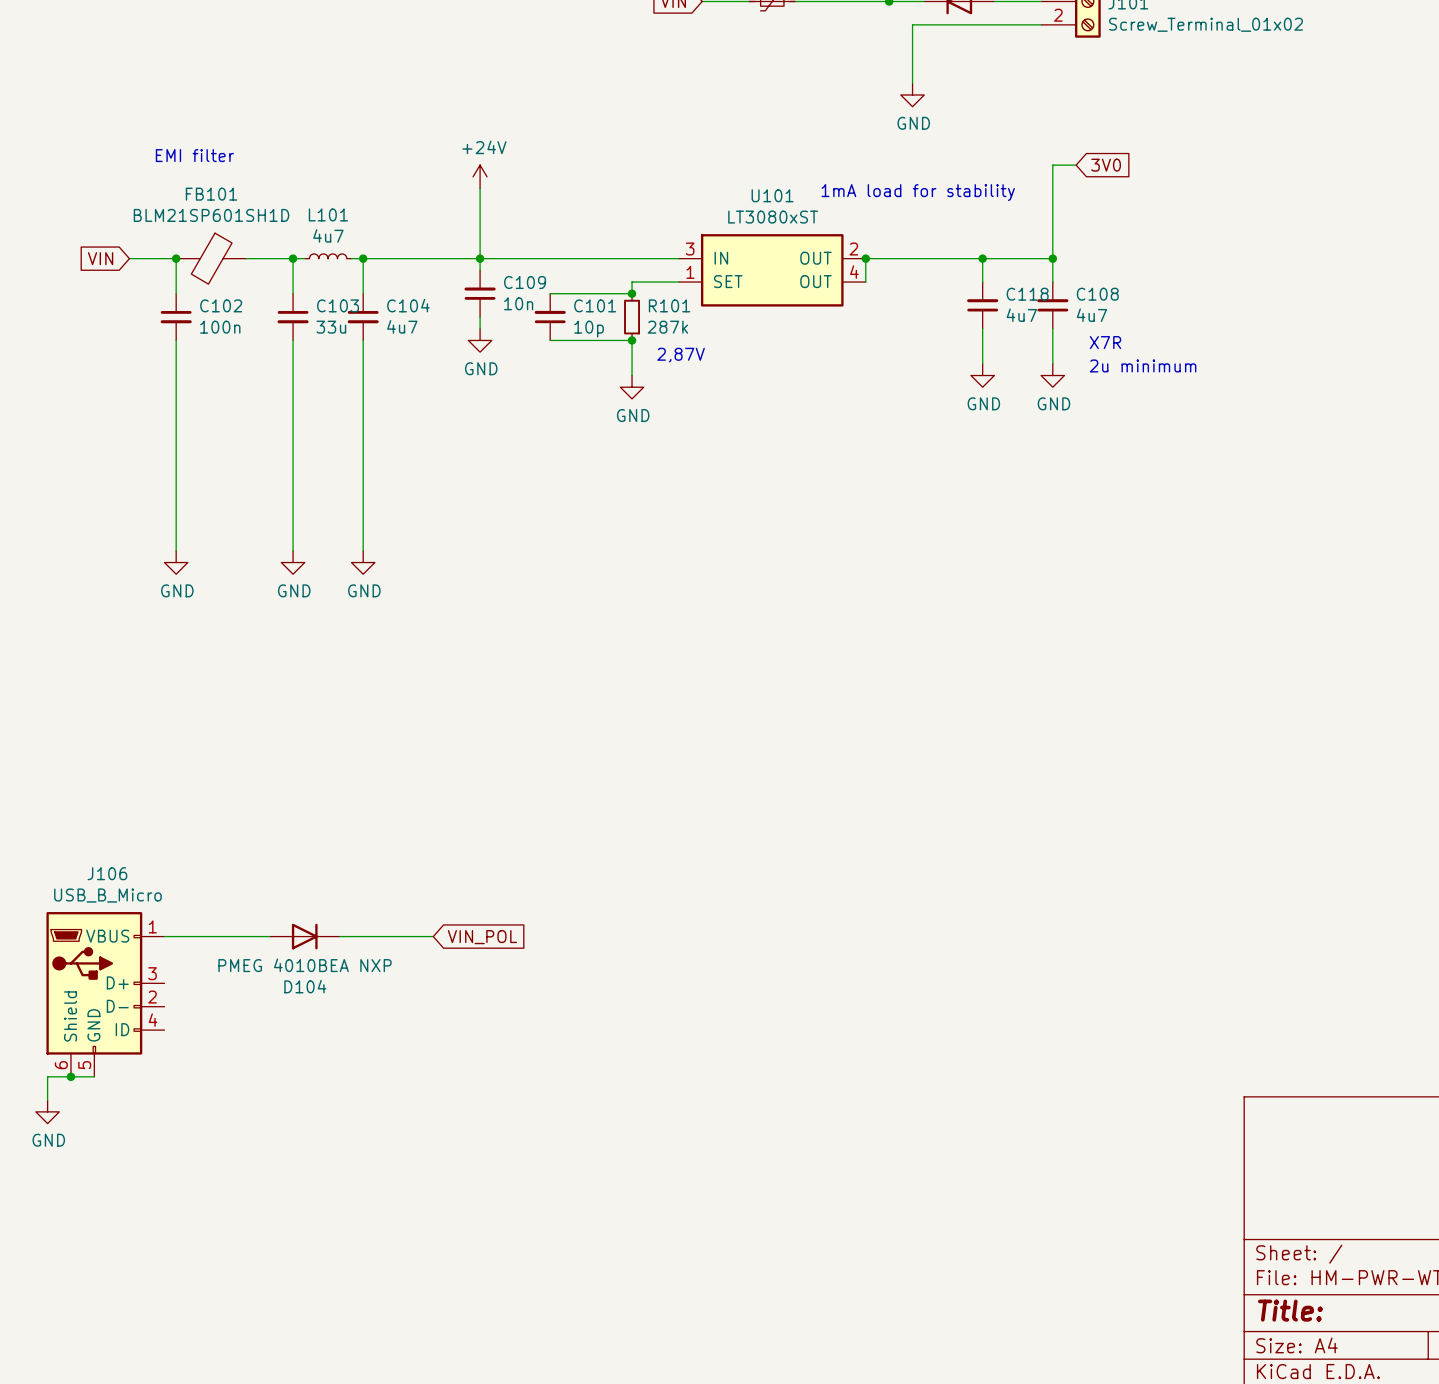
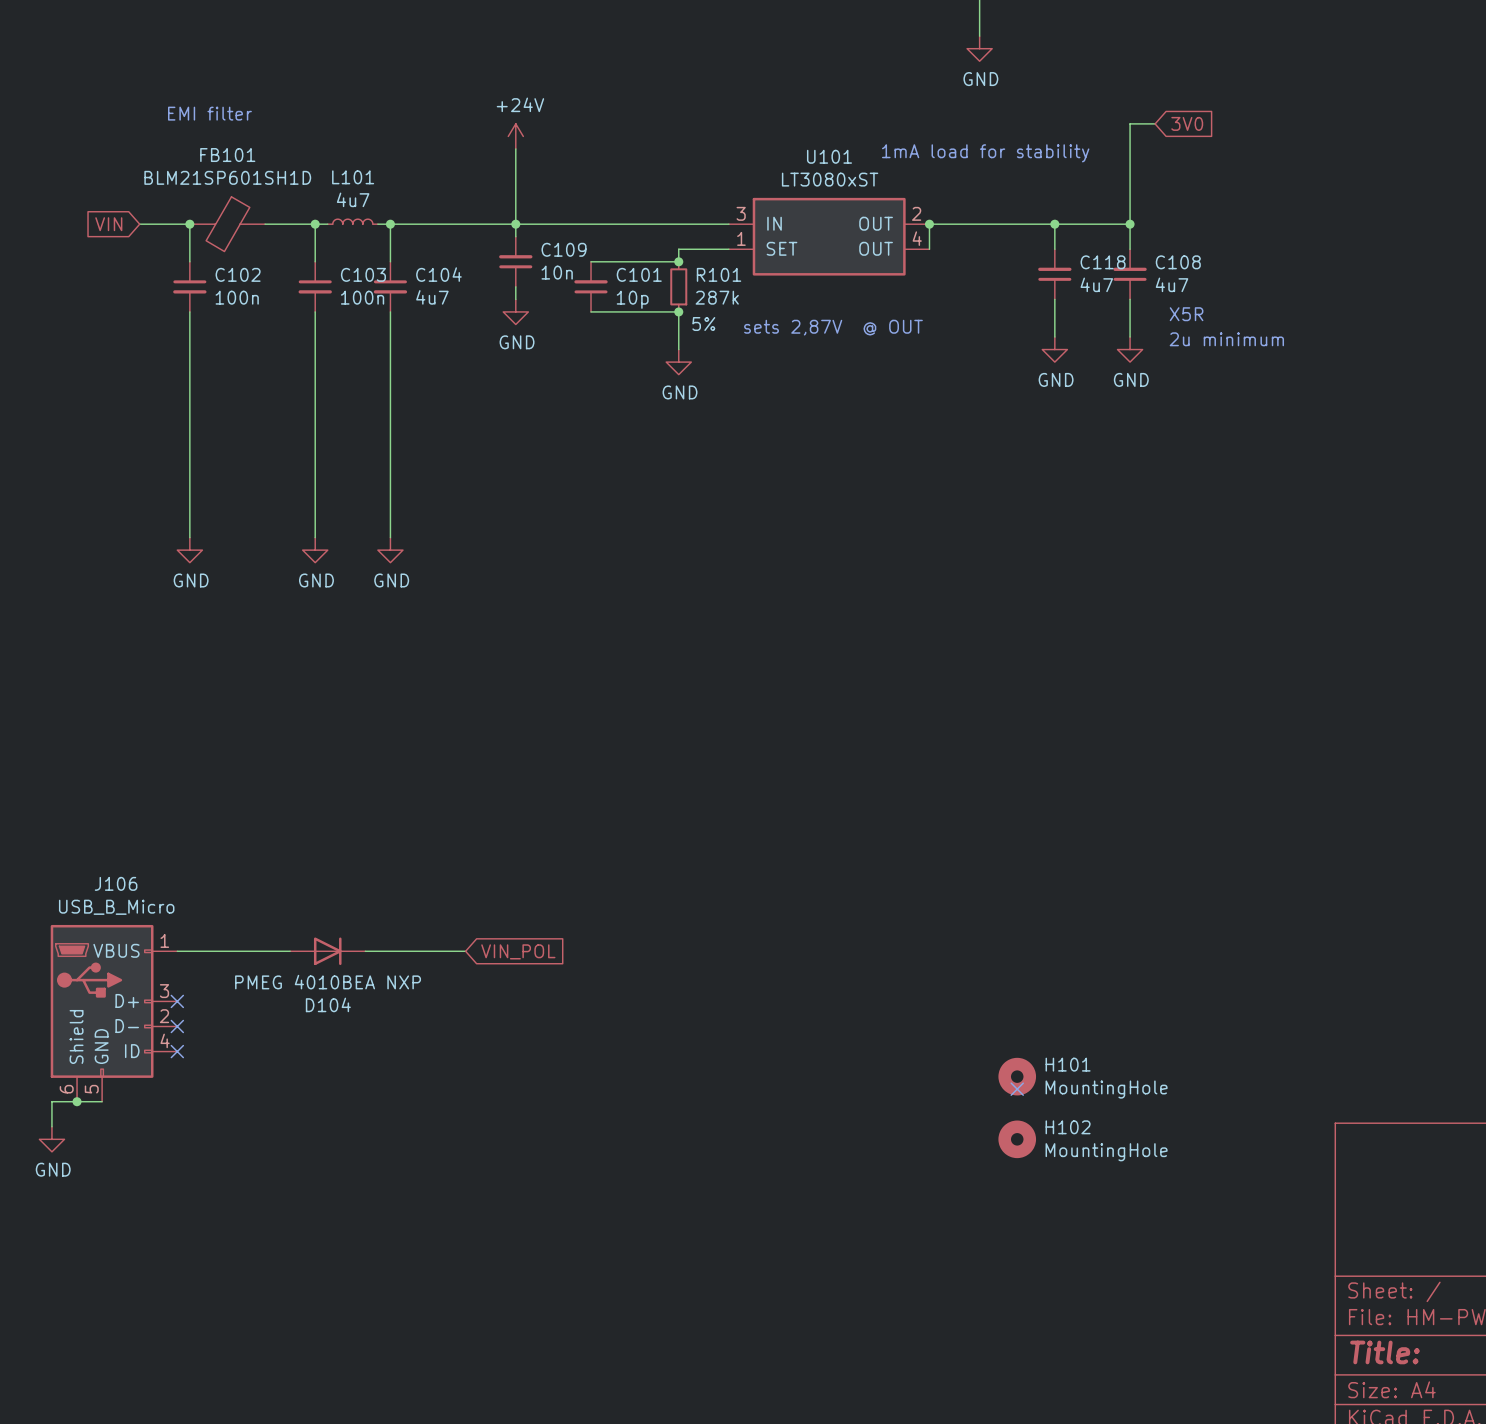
C103 value: 33u (331, 327) -> 100n (362, 297)
text: X7R (1105, 342) -> X5R (1186, 314)
R101 text: none -> 5% (703, 324)
text: 2,87V (681, 355) -> none
text: none -> sets 2,87V @ OUT (833, 327)
no-connect mark: none -> (177, 1001)
no-connect mark: none -> (177, 1026)
no-connect mark: none -> (177, 1051)
H101: none -> MountingHole (1017, 1076)
no-connect mark: none -> (1017, 1089)
H102: none -> MountingHole (1017, 1139)

